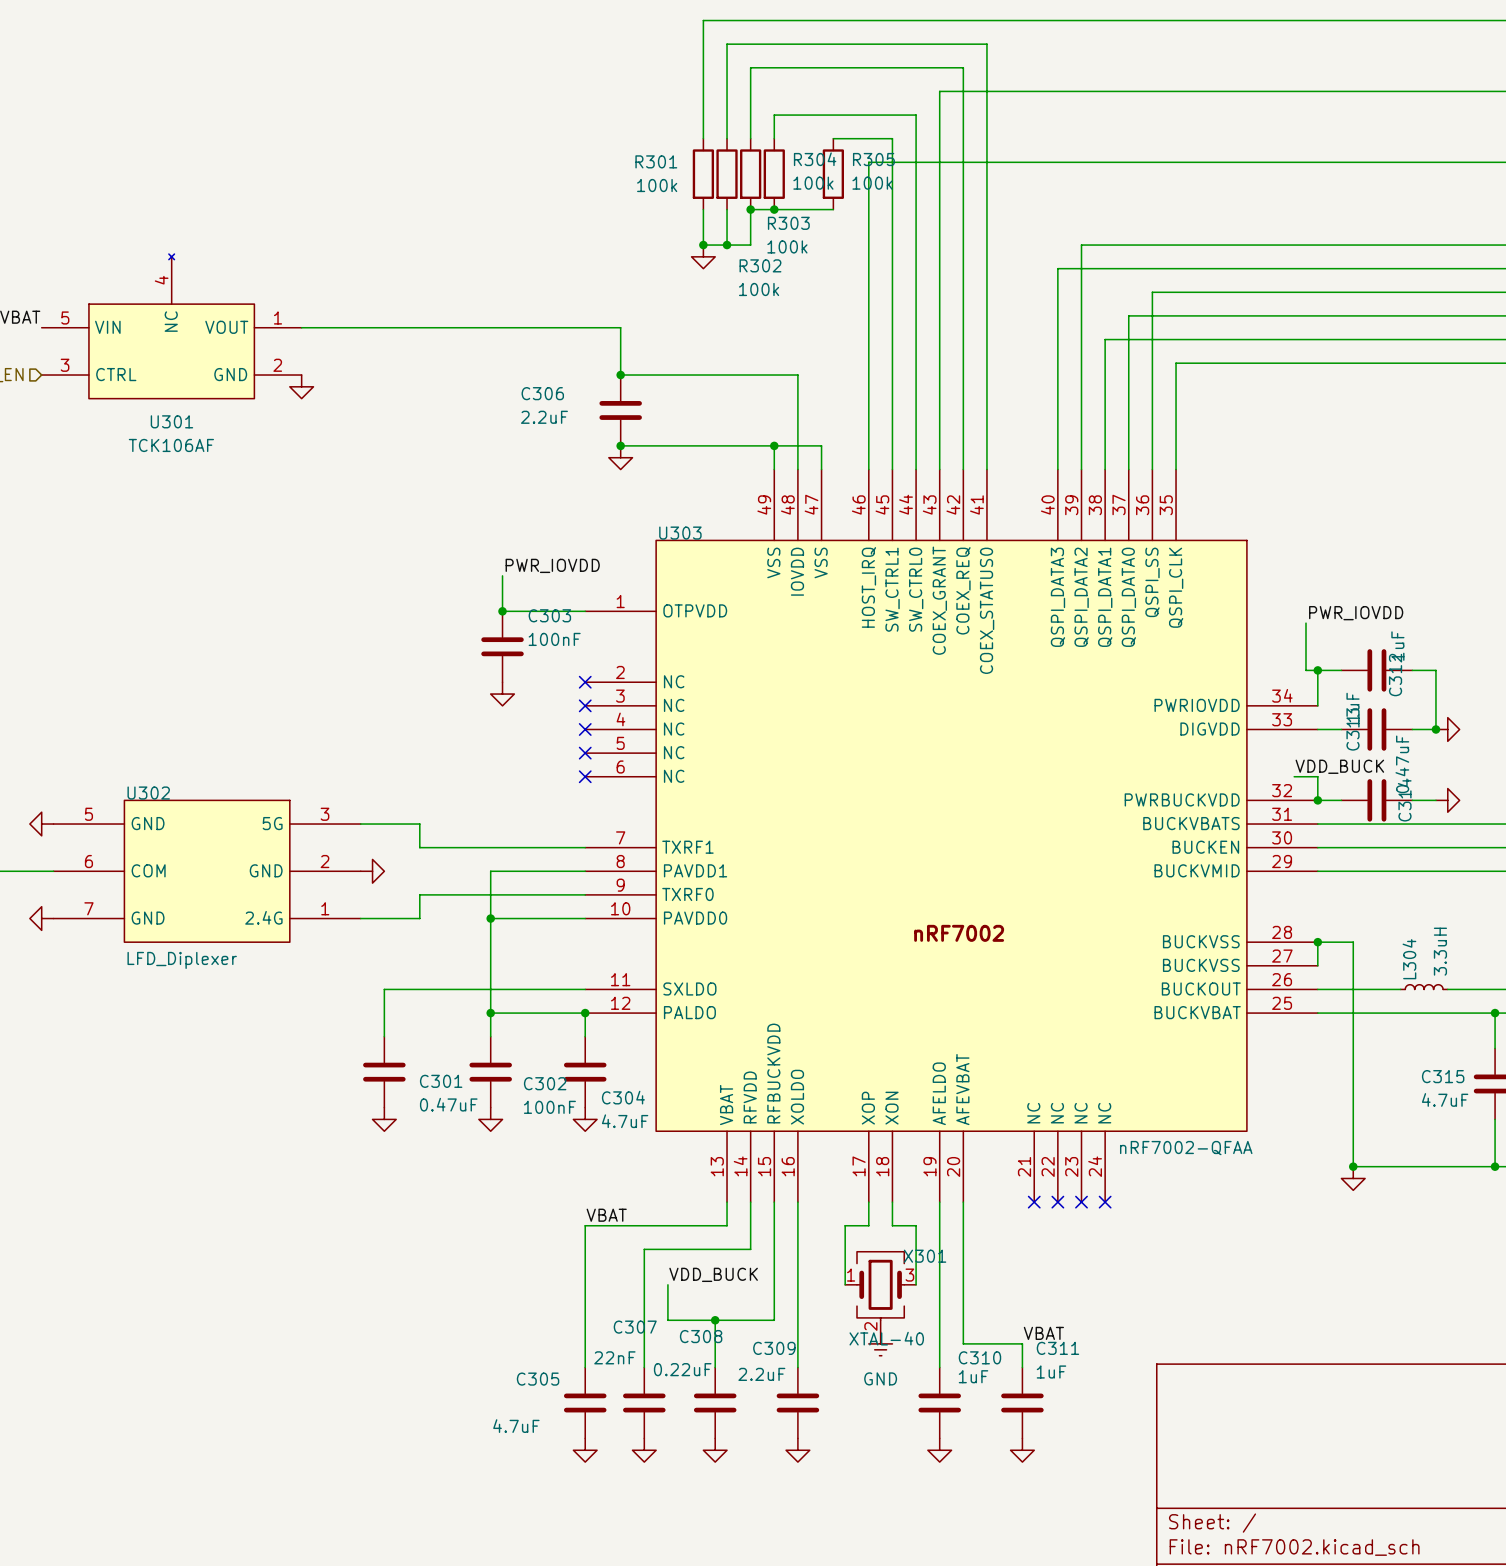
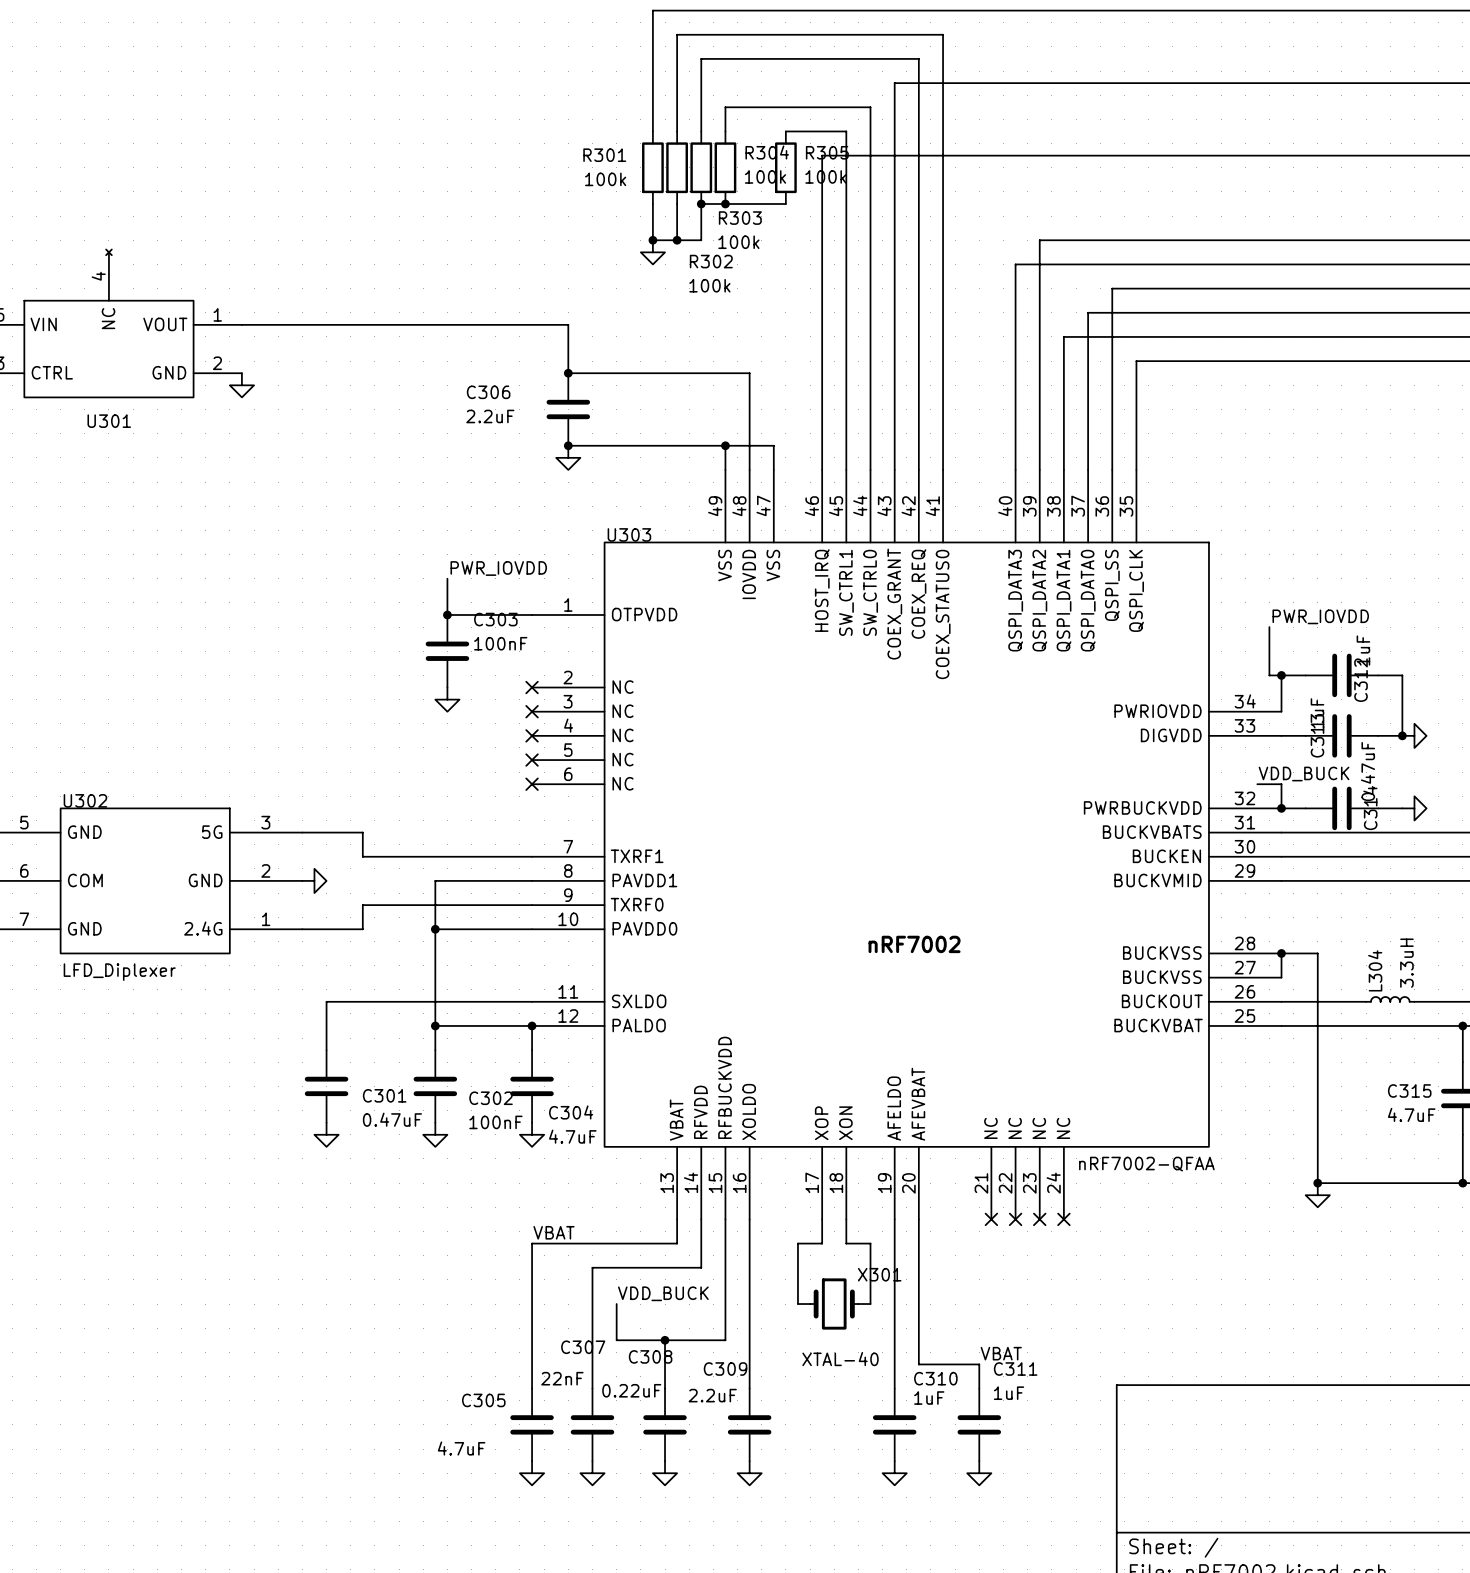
U301 value: TCK106AF (171, 445) -> none
X301 symbol: [845, 1251, 917, 1333] -> [797, 1278, 871, 1330]
power symbol: GND (880, 1343) -> none

